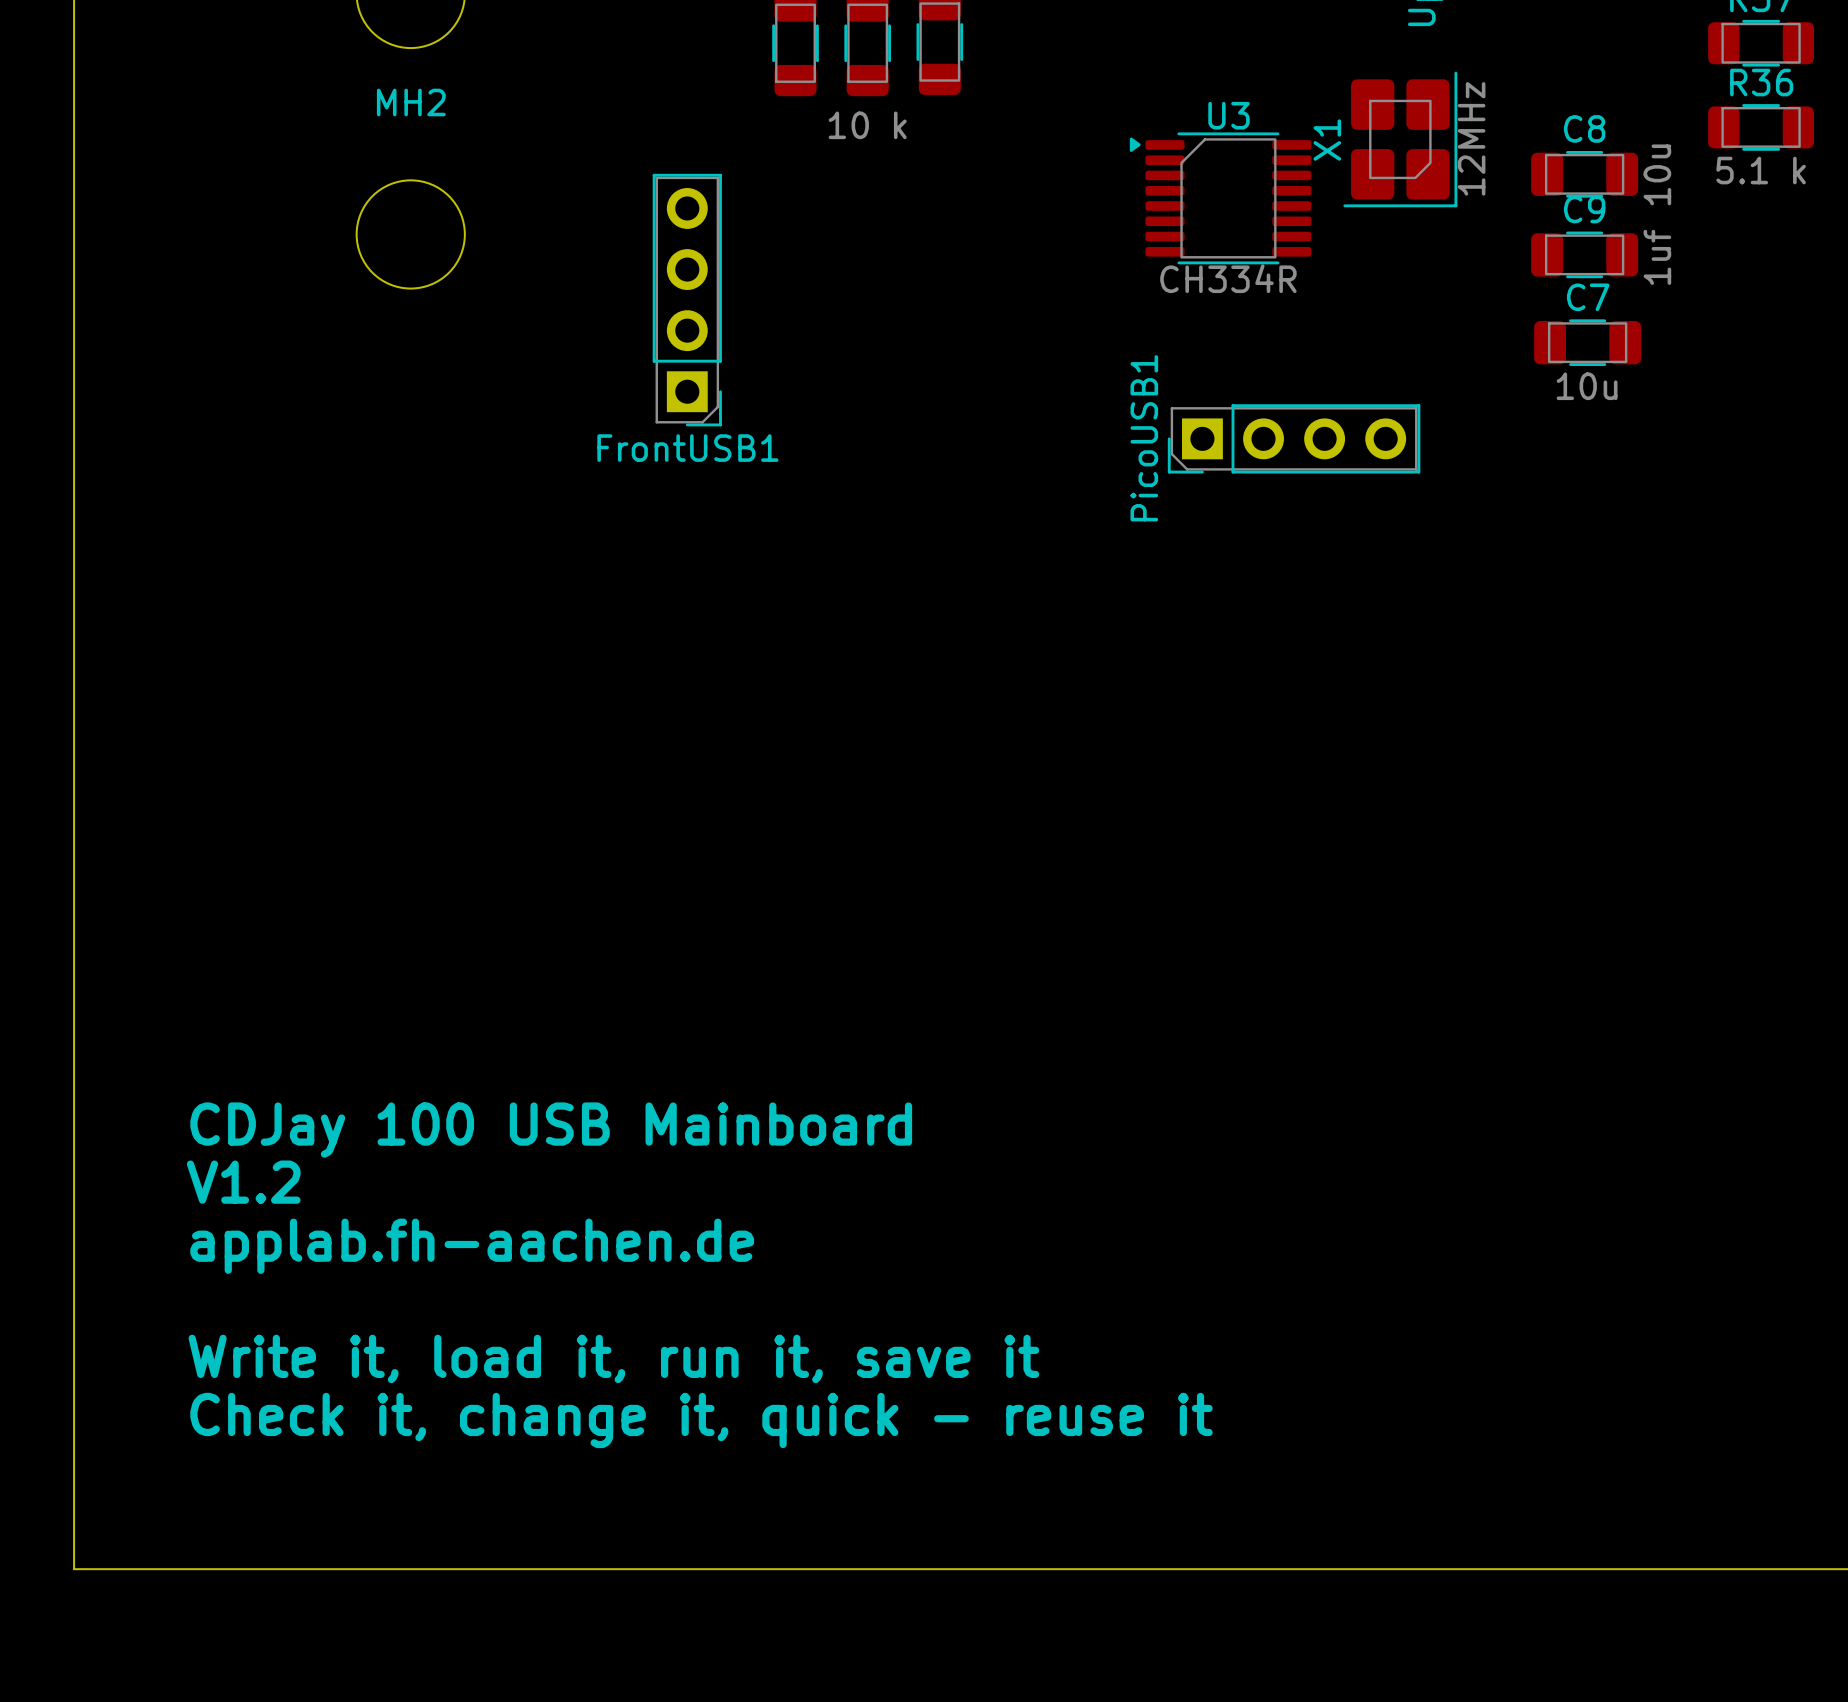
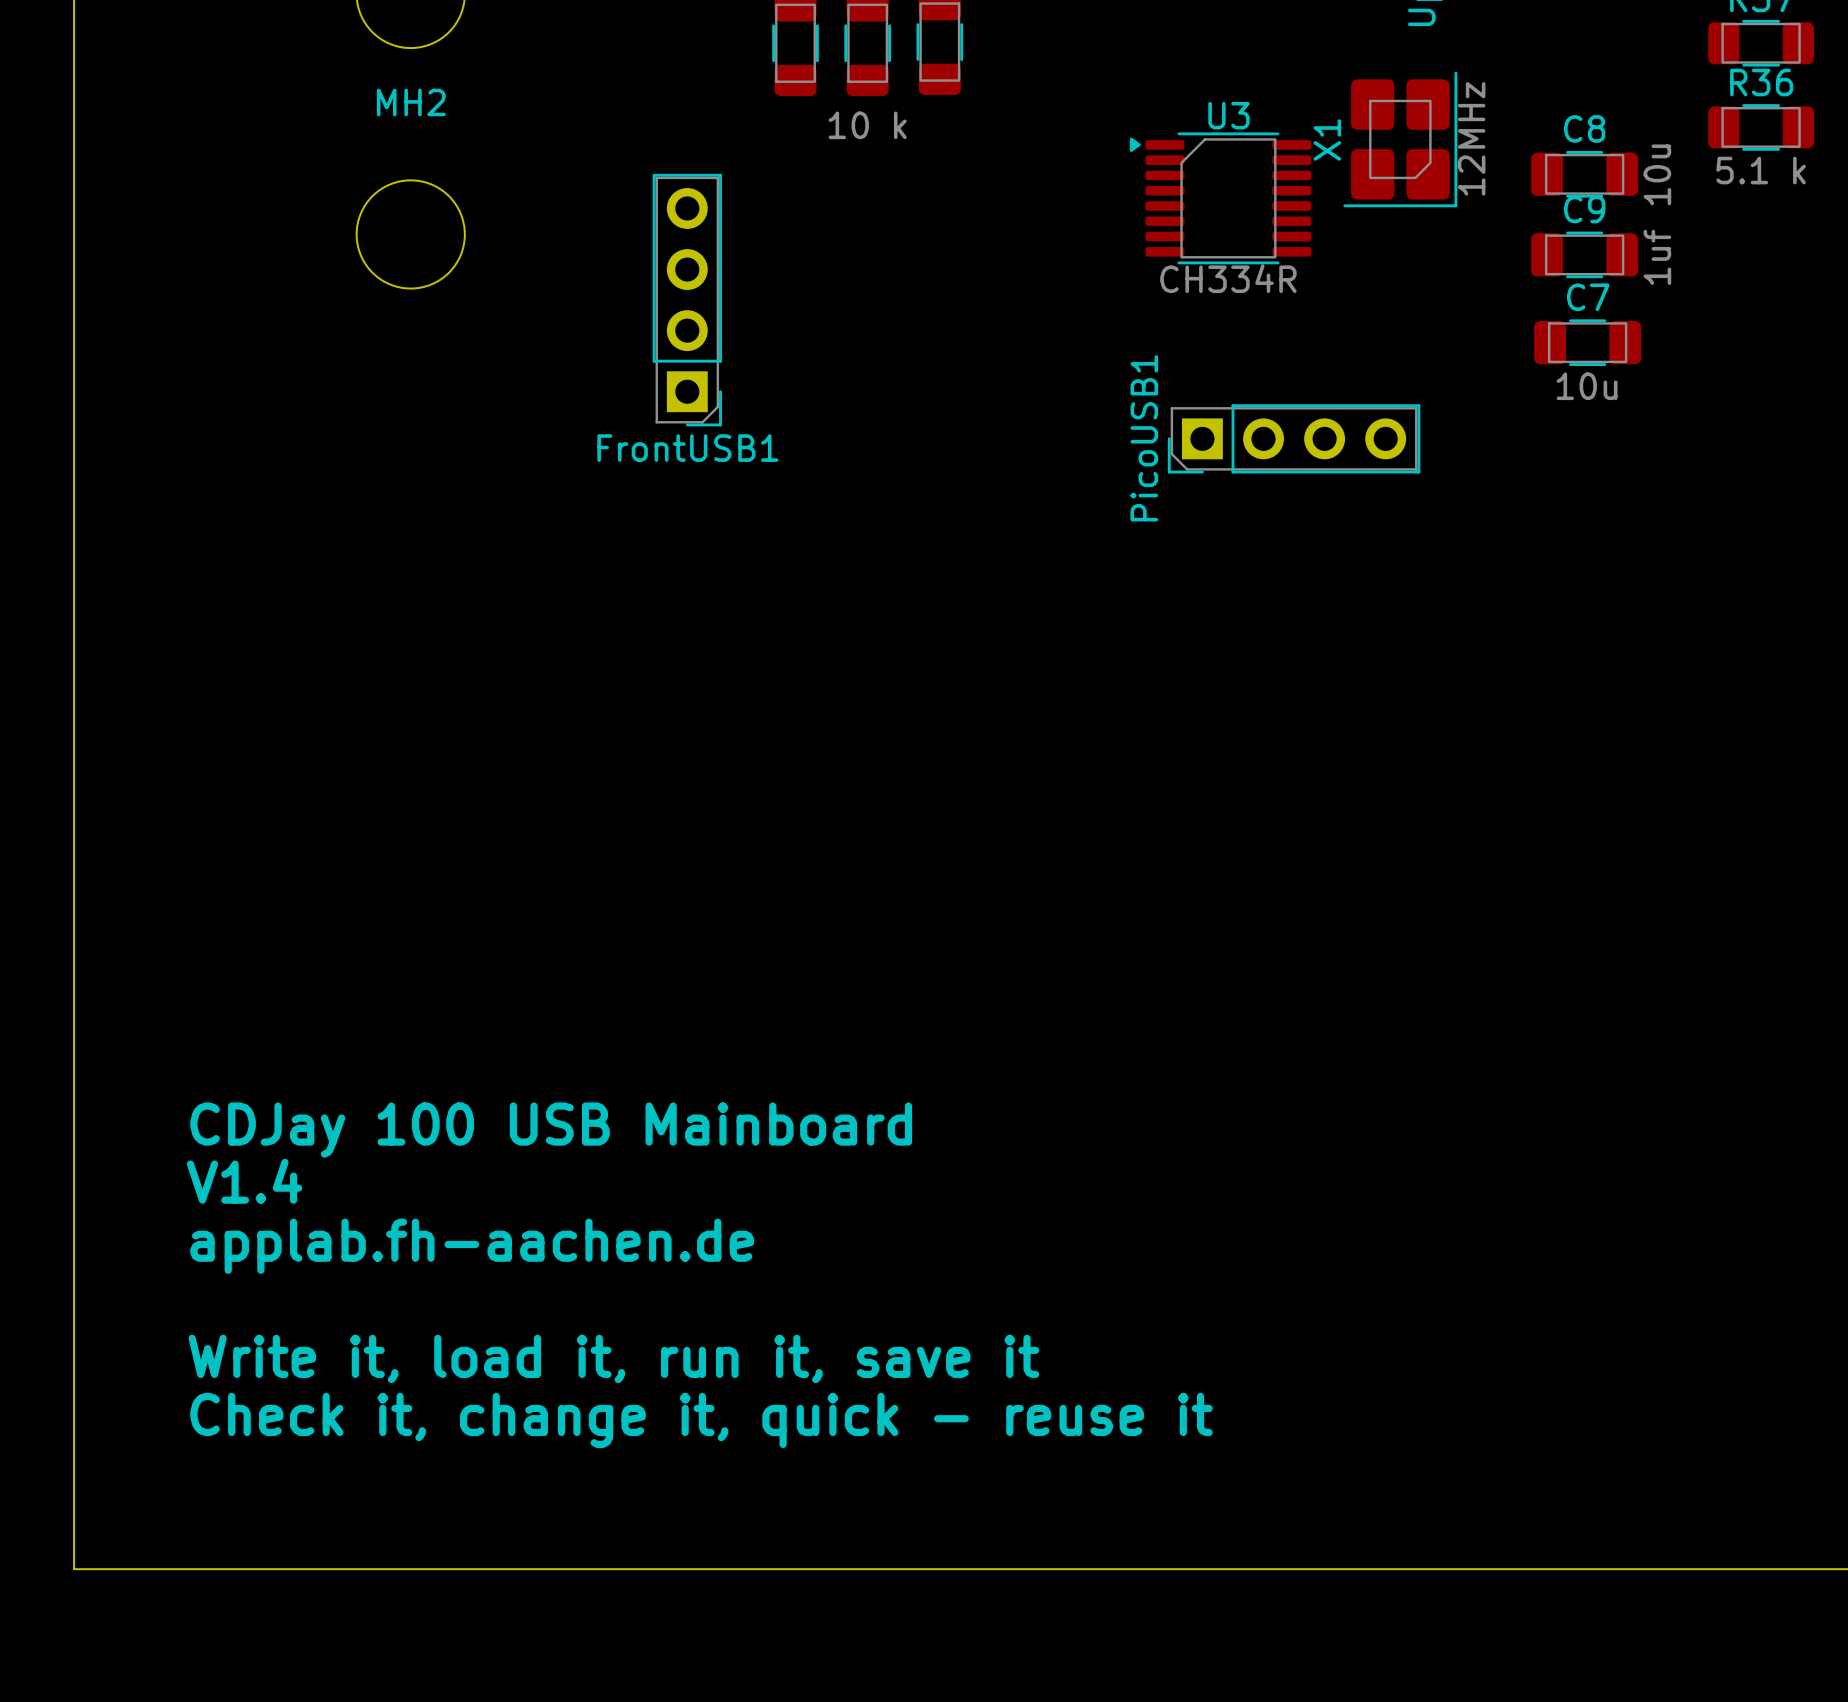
text: V1.2 (243, 1182) -> V1.4 (244, 1181)

